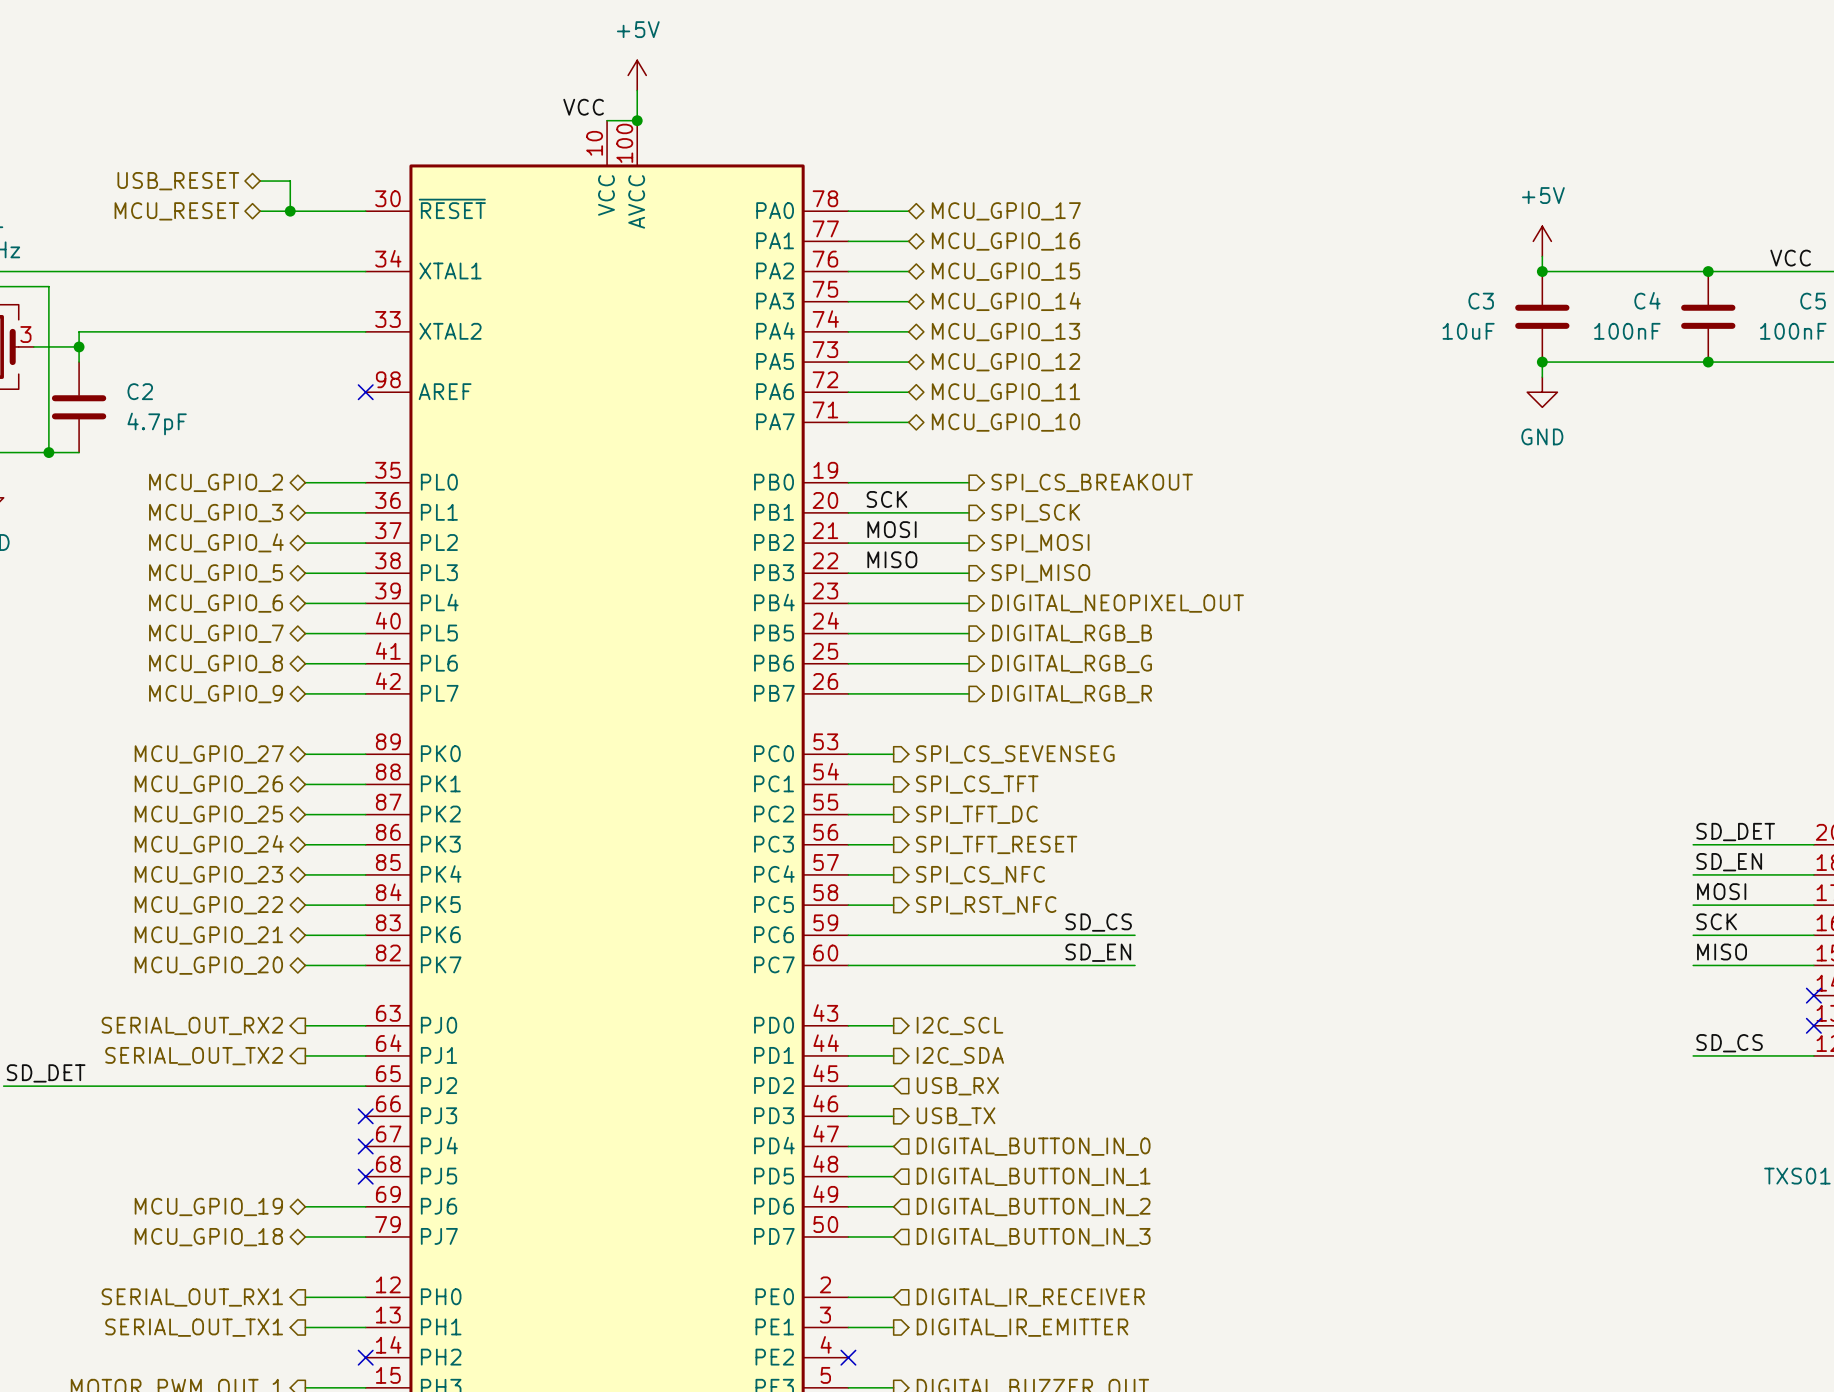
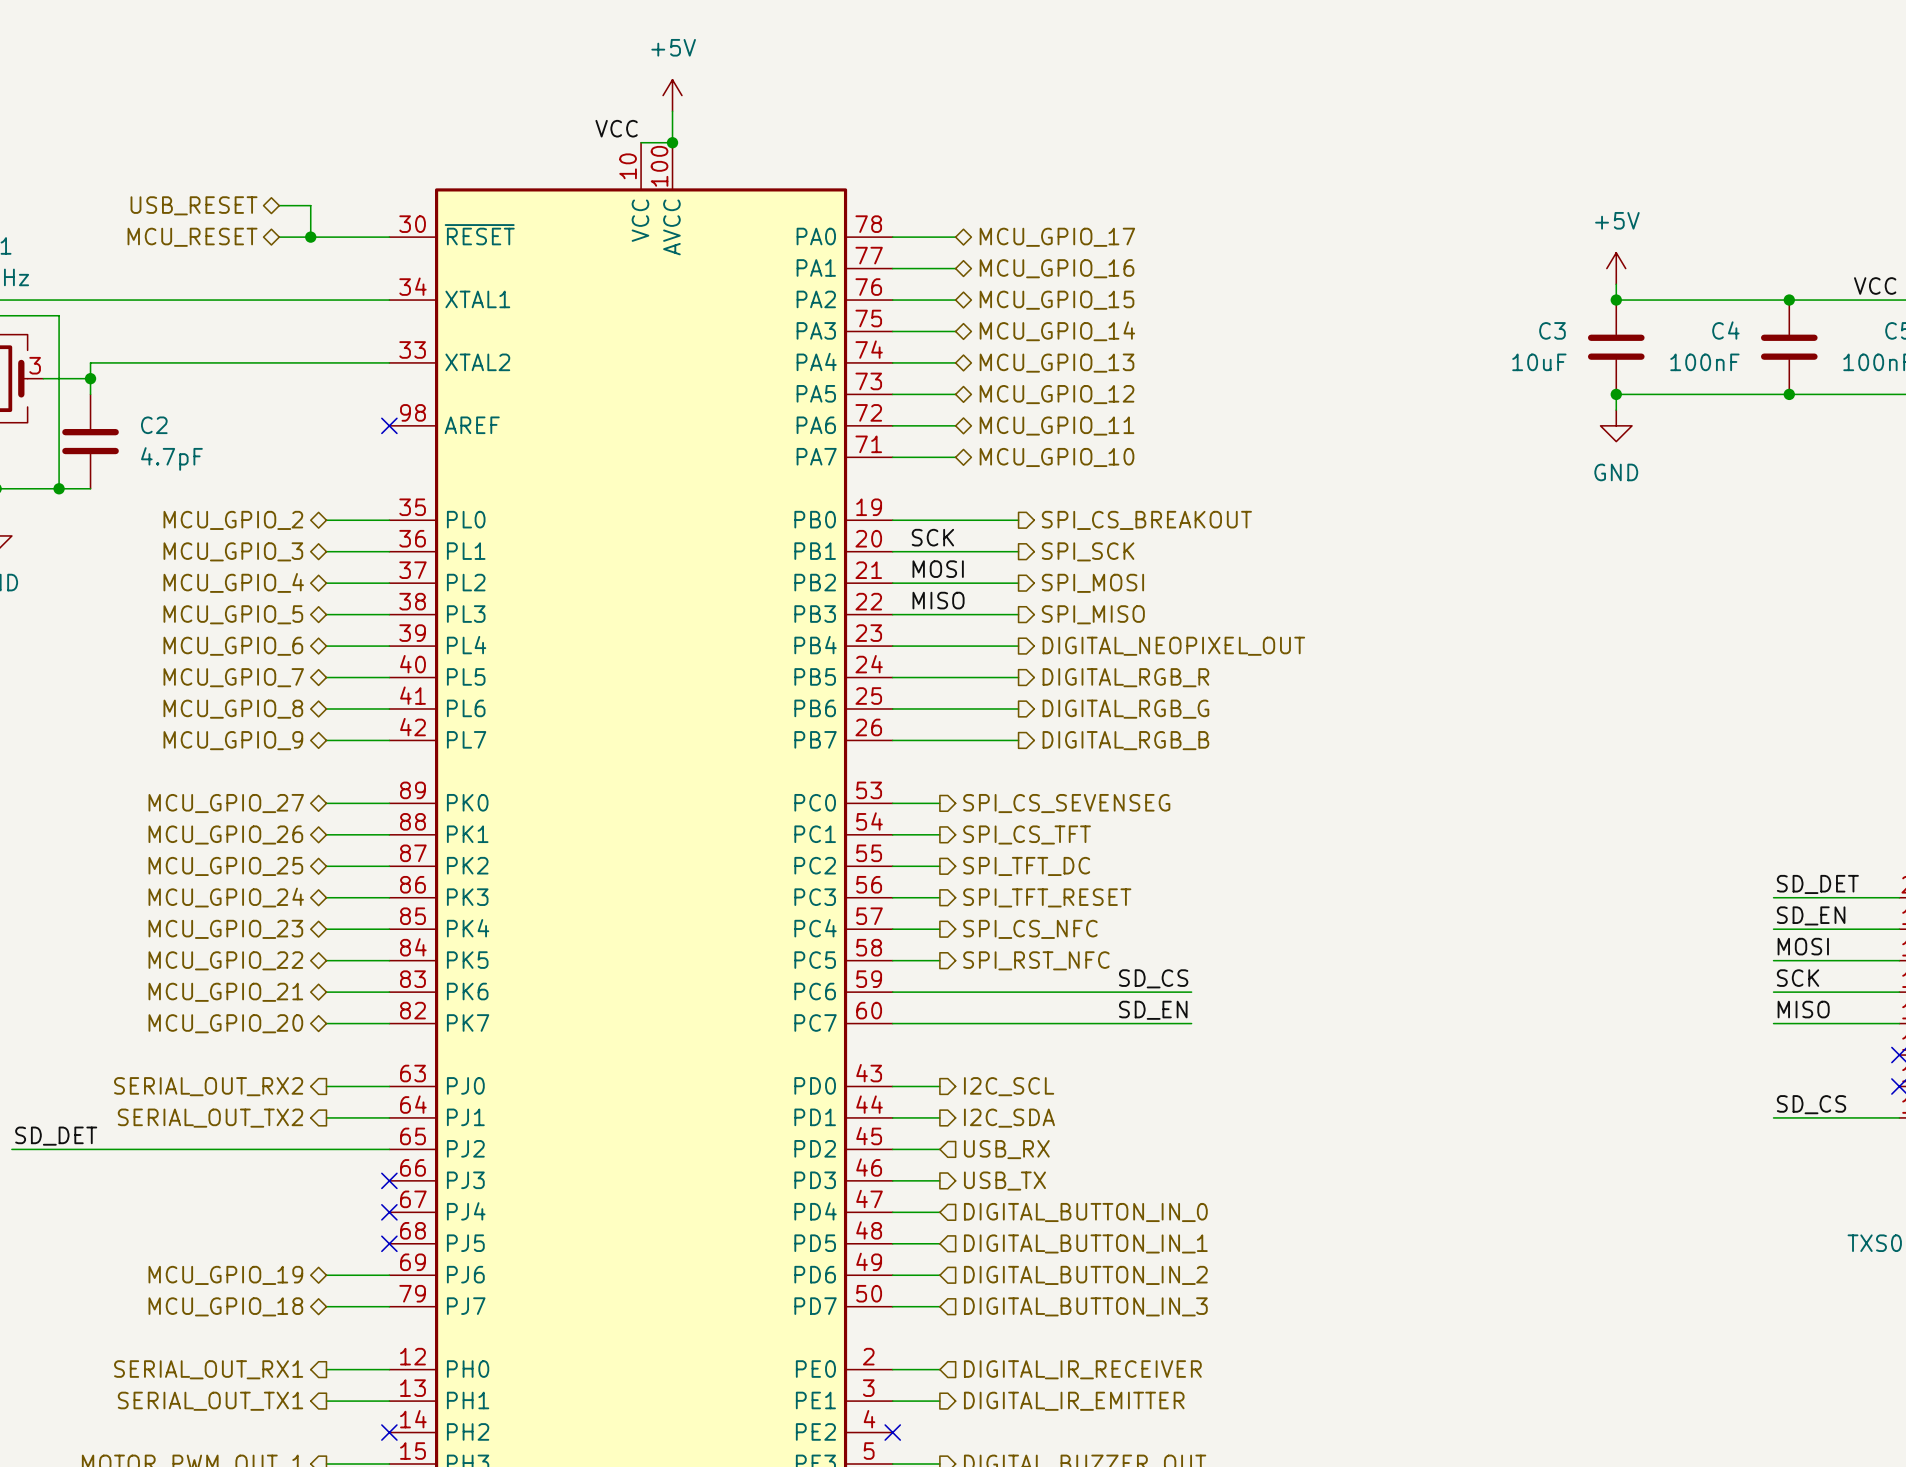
hierarchical label: DIGITAL_RGB_B (1072, 633) -> DIGITAL_RGB_R (1125, 677)
hierarchical label: DIGITAL_RGB_R (1072, 694) -> DIGITAL_RGB_B (1125, 740)

